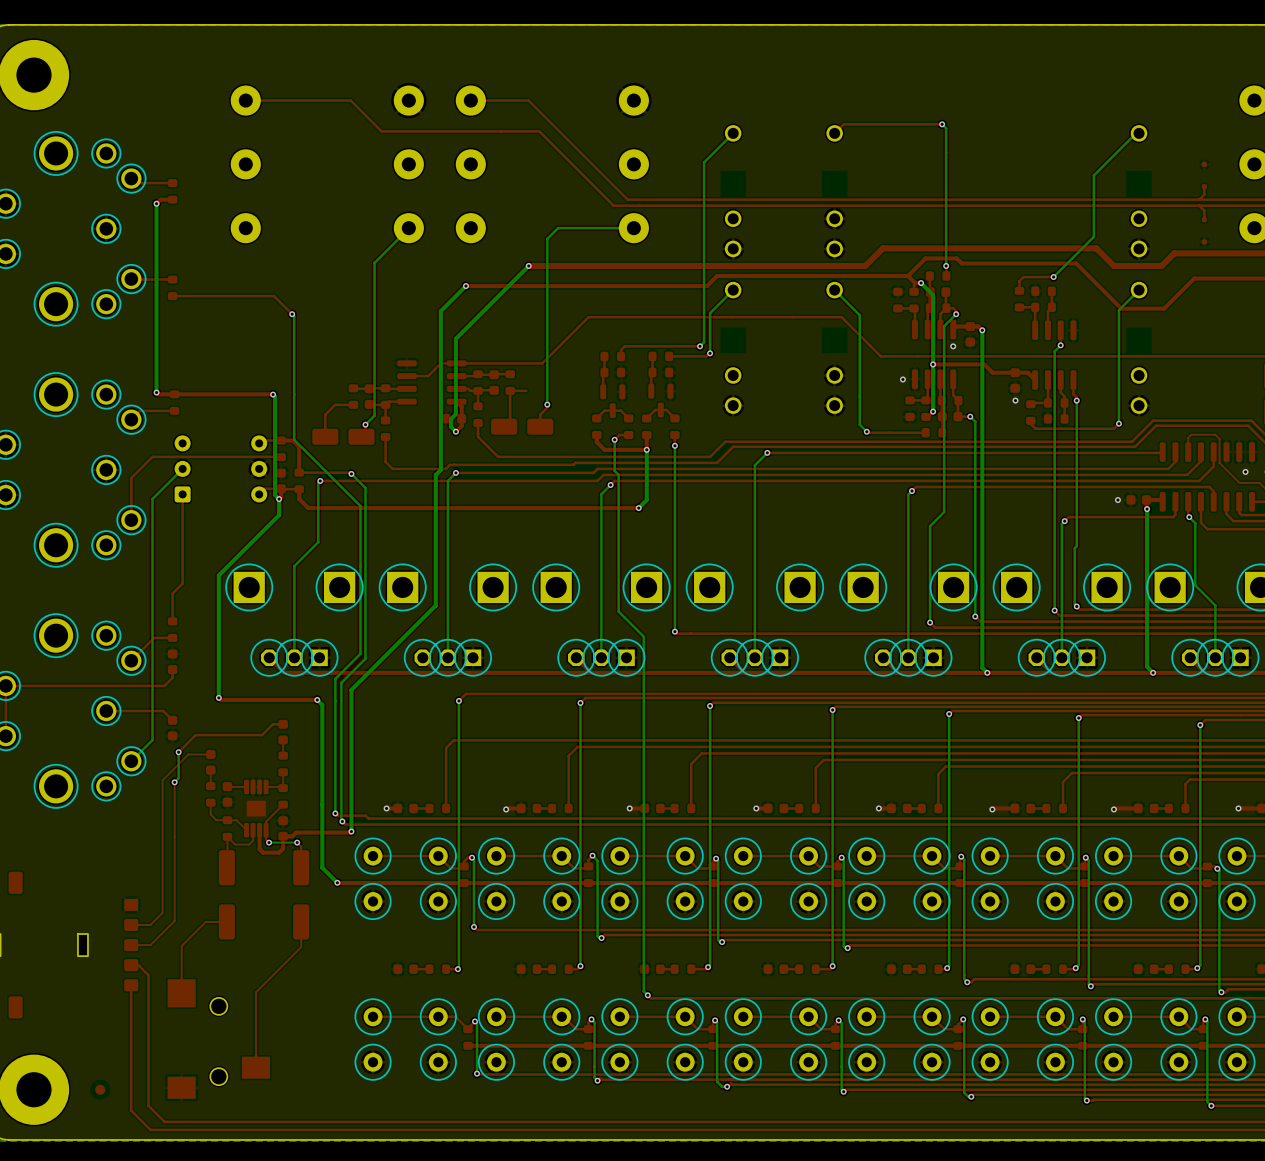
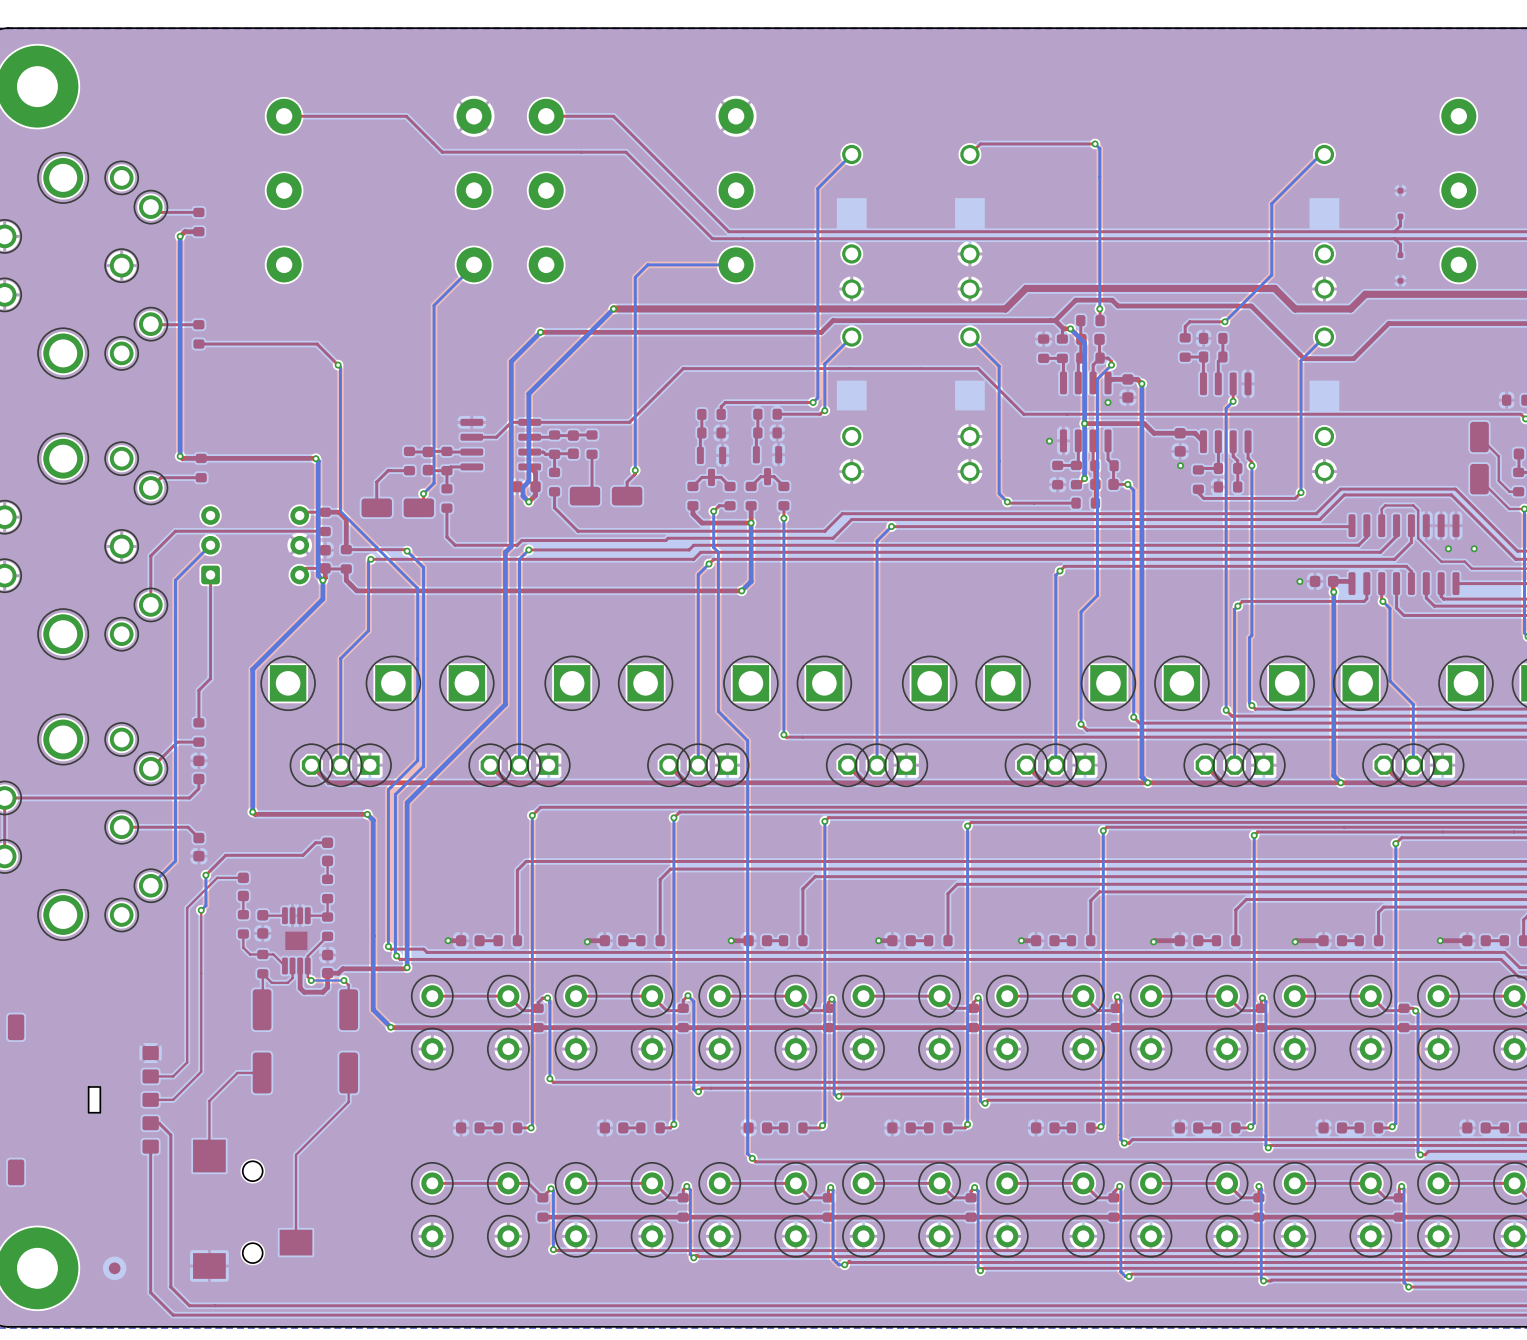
top track: (526, 390) (510, 390) -> none

